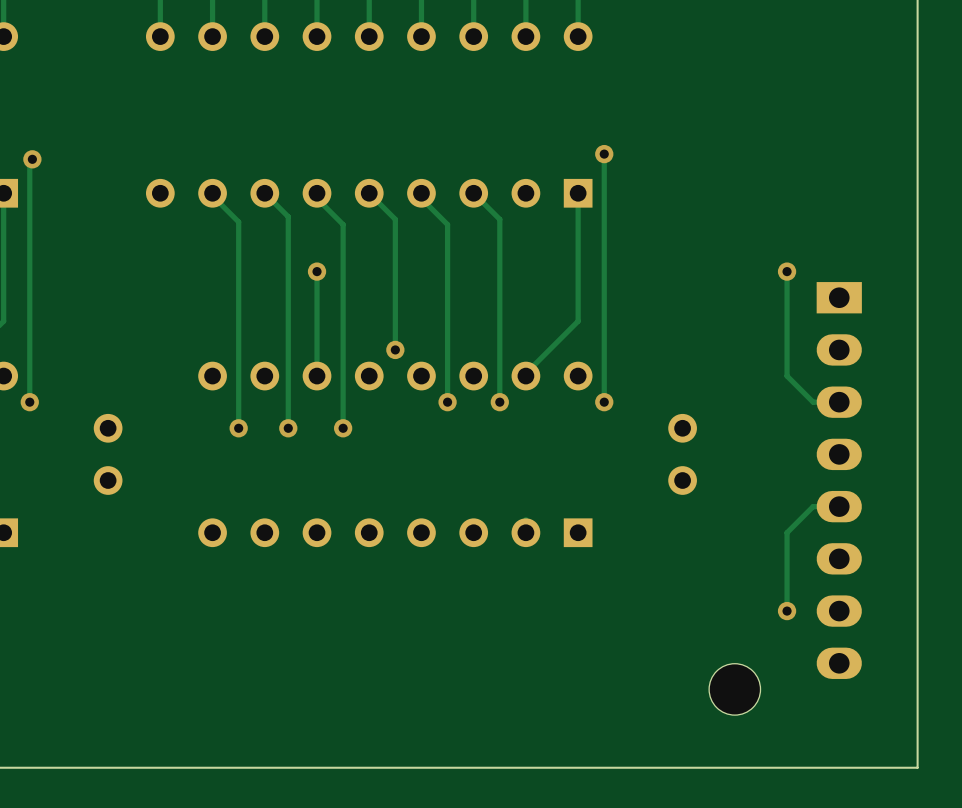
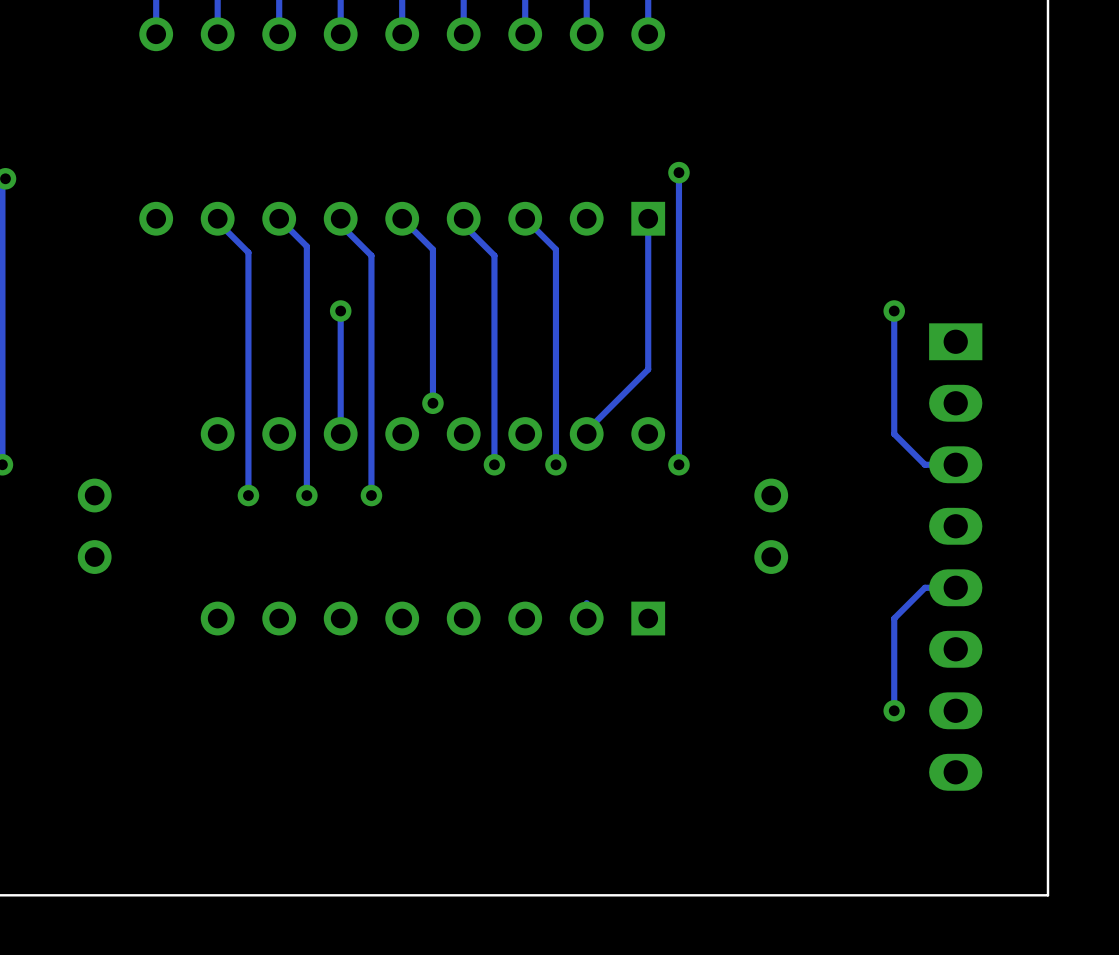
part: (734, 689) -> none

